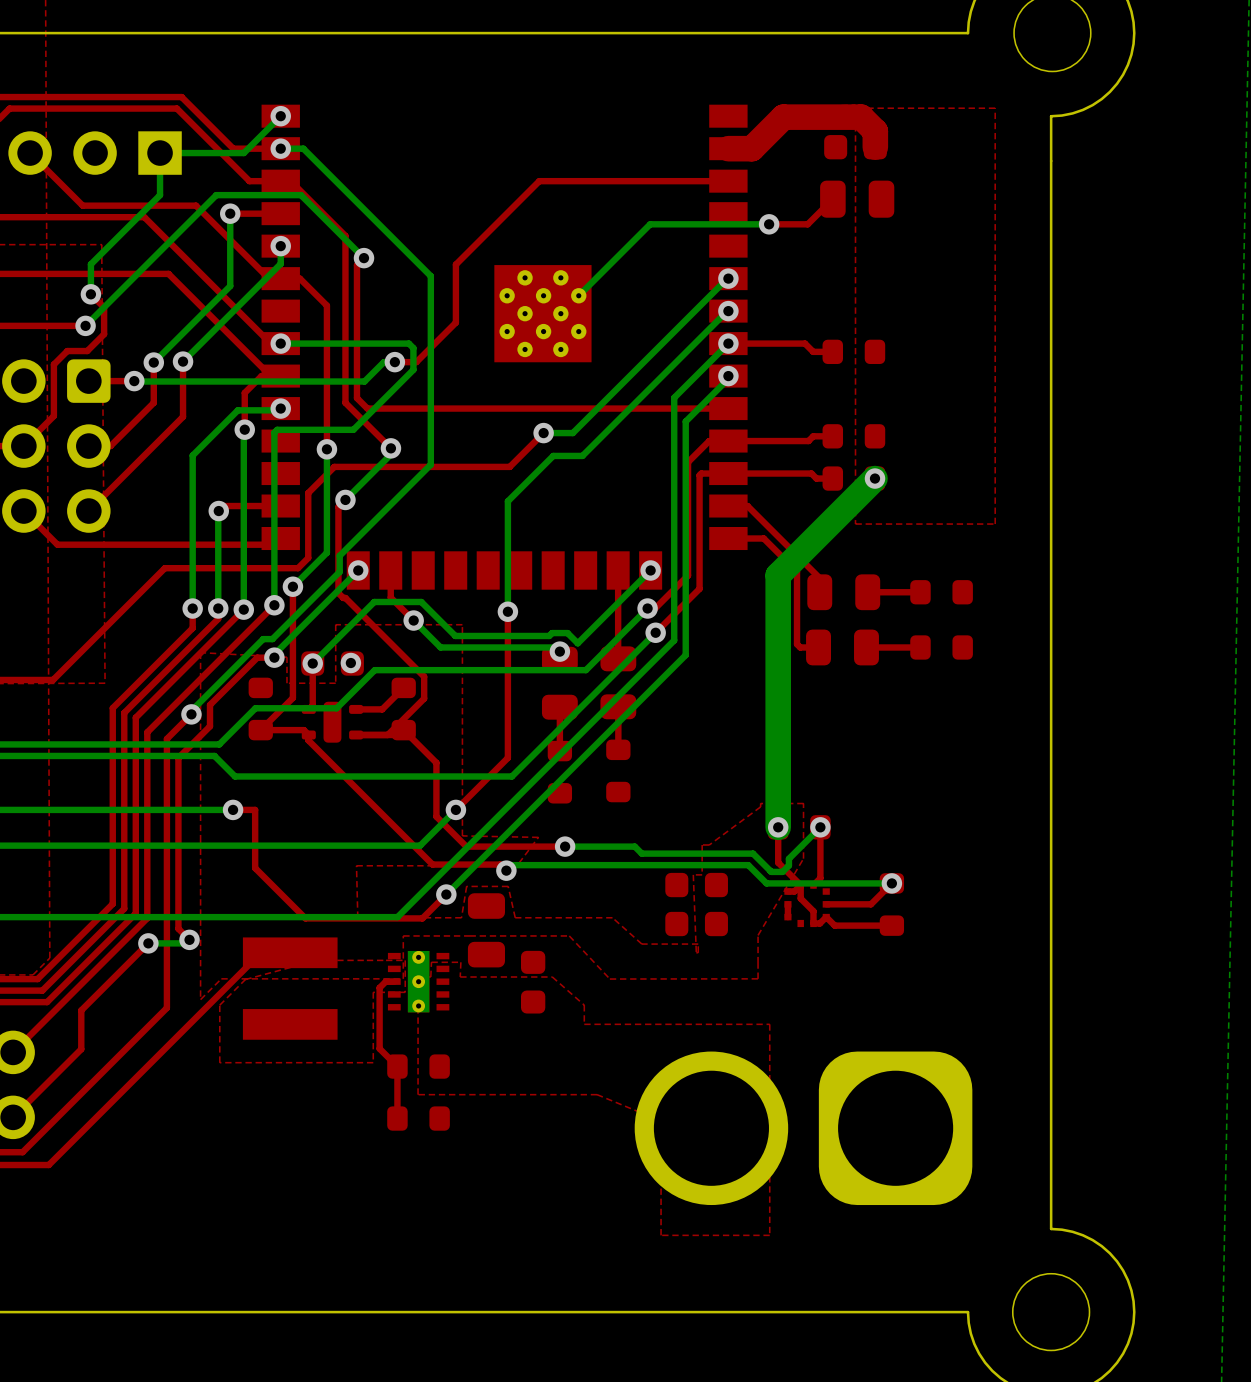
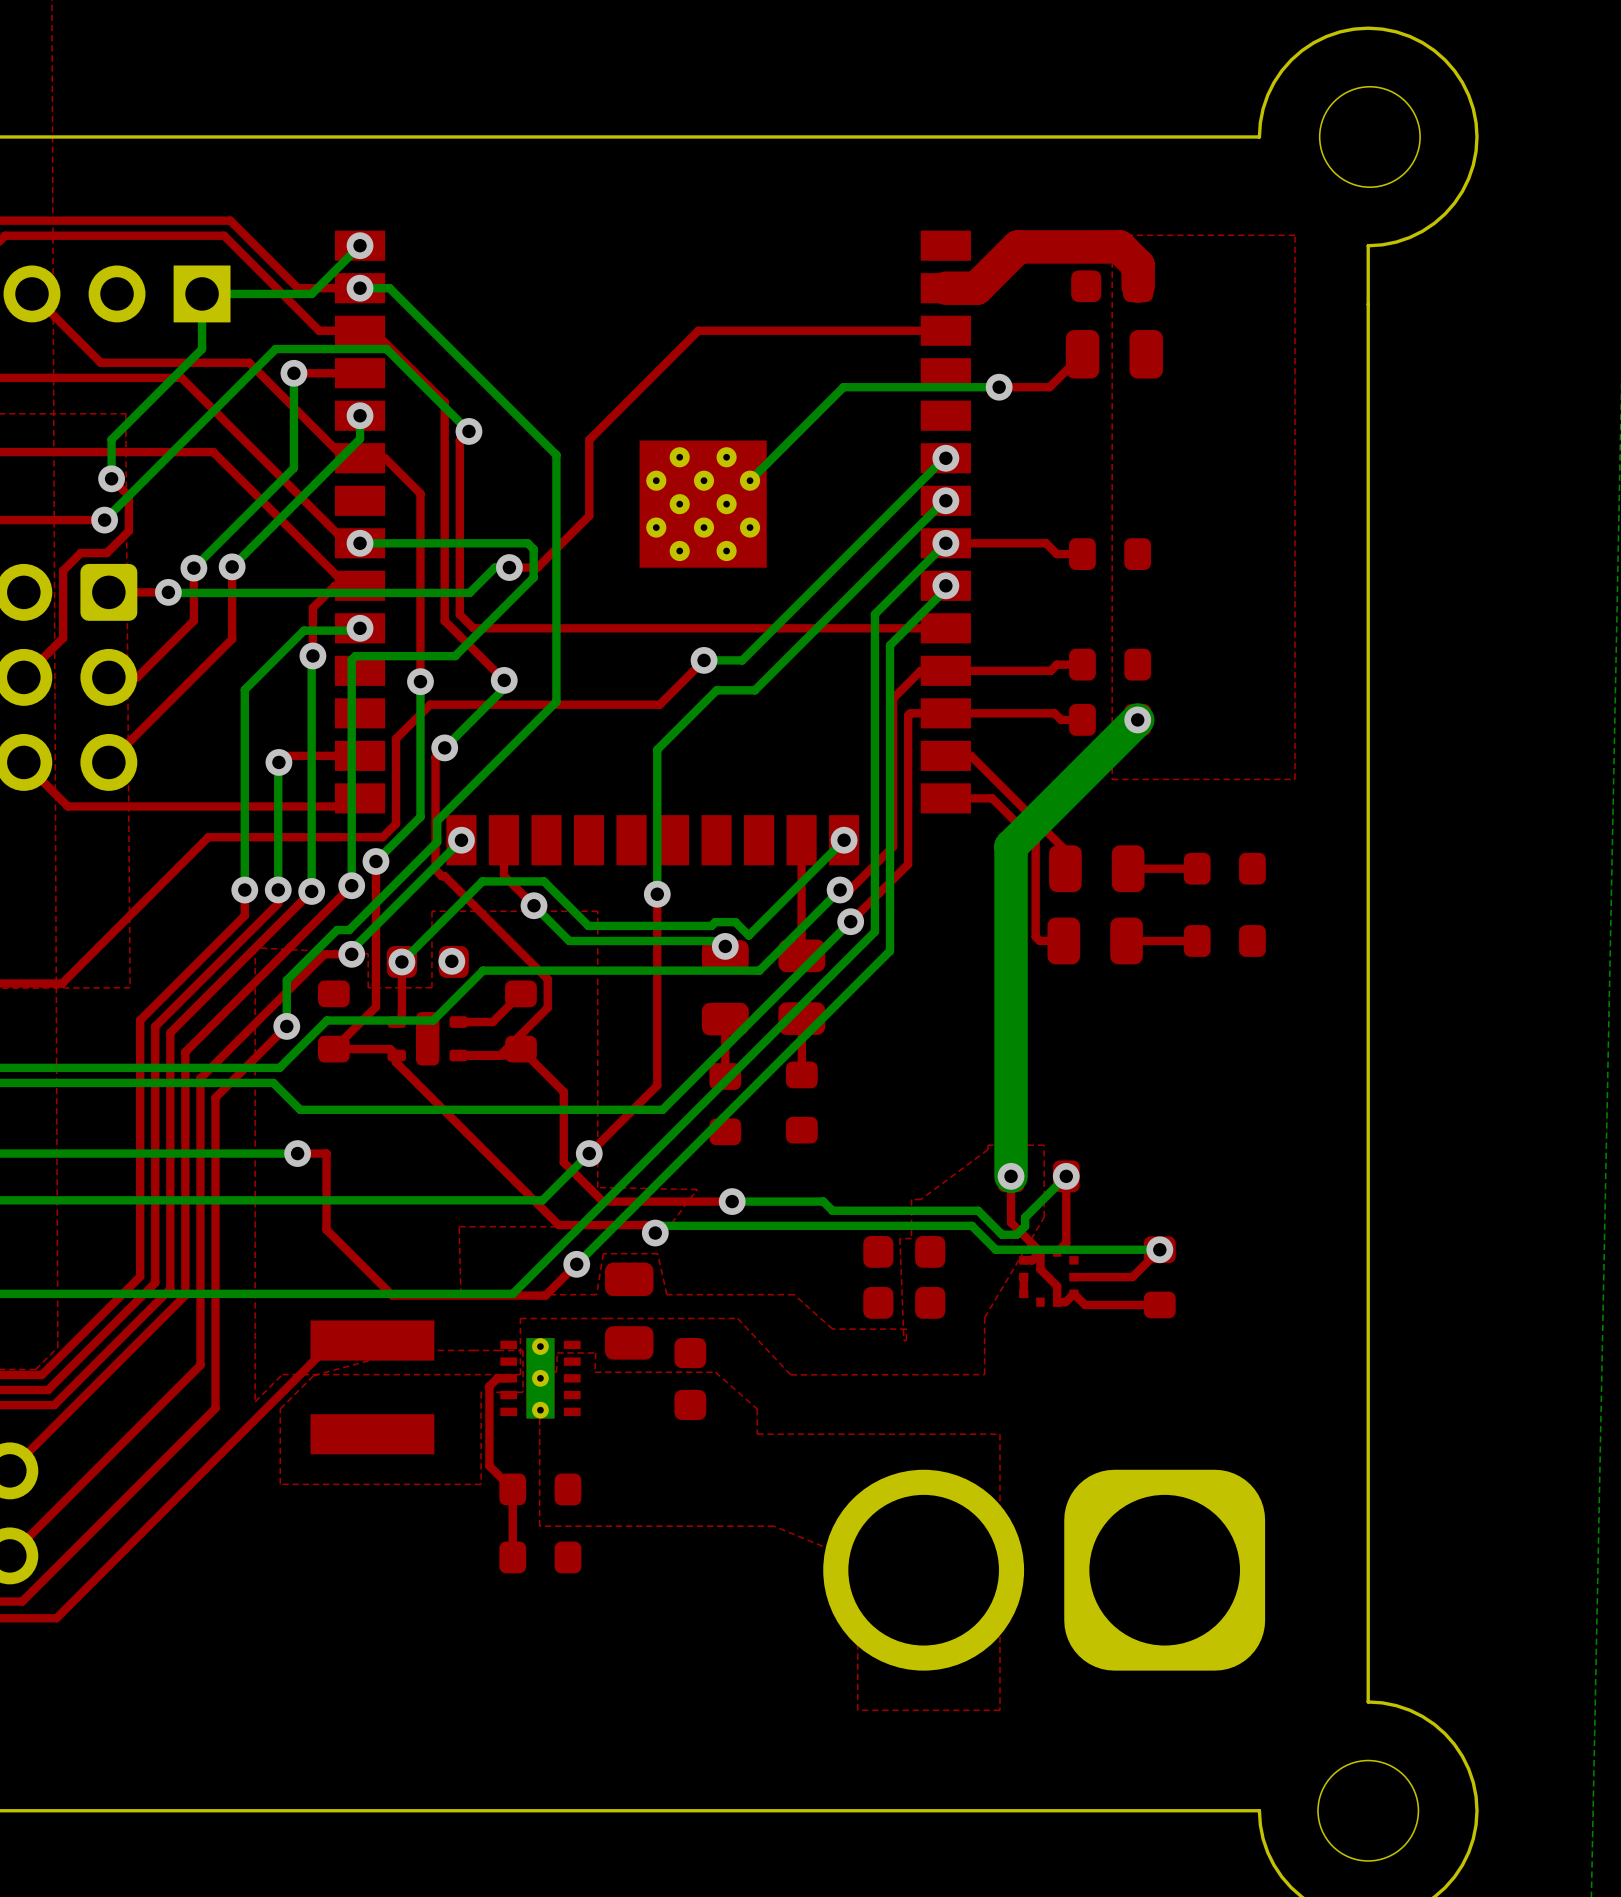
top track: (257, 657) (210, 704) (210, 726) (178, 757) (178, 928) (189, 939) -> (329, 954) (324, 954) (200, 1078) (200, 1365) (98, 1466)
bottom track: (224, 677) (191, 710) (191, 714) -> (286, 980) (286, 1026)
top track: (191, 714) (166, 738) (166, 1007) -> (286, 1026) (215, 1097) (215, 1408) (211, 1412)
via position: (191, 714) -> (286, 1026)
bottom track: (189, 939) (186, 943) (148, 943) -> none
via: (189, 939) -> none
top track: (148, 943) (81, 1010) (81, 1049) -> none
via: (148, 943) -> none

